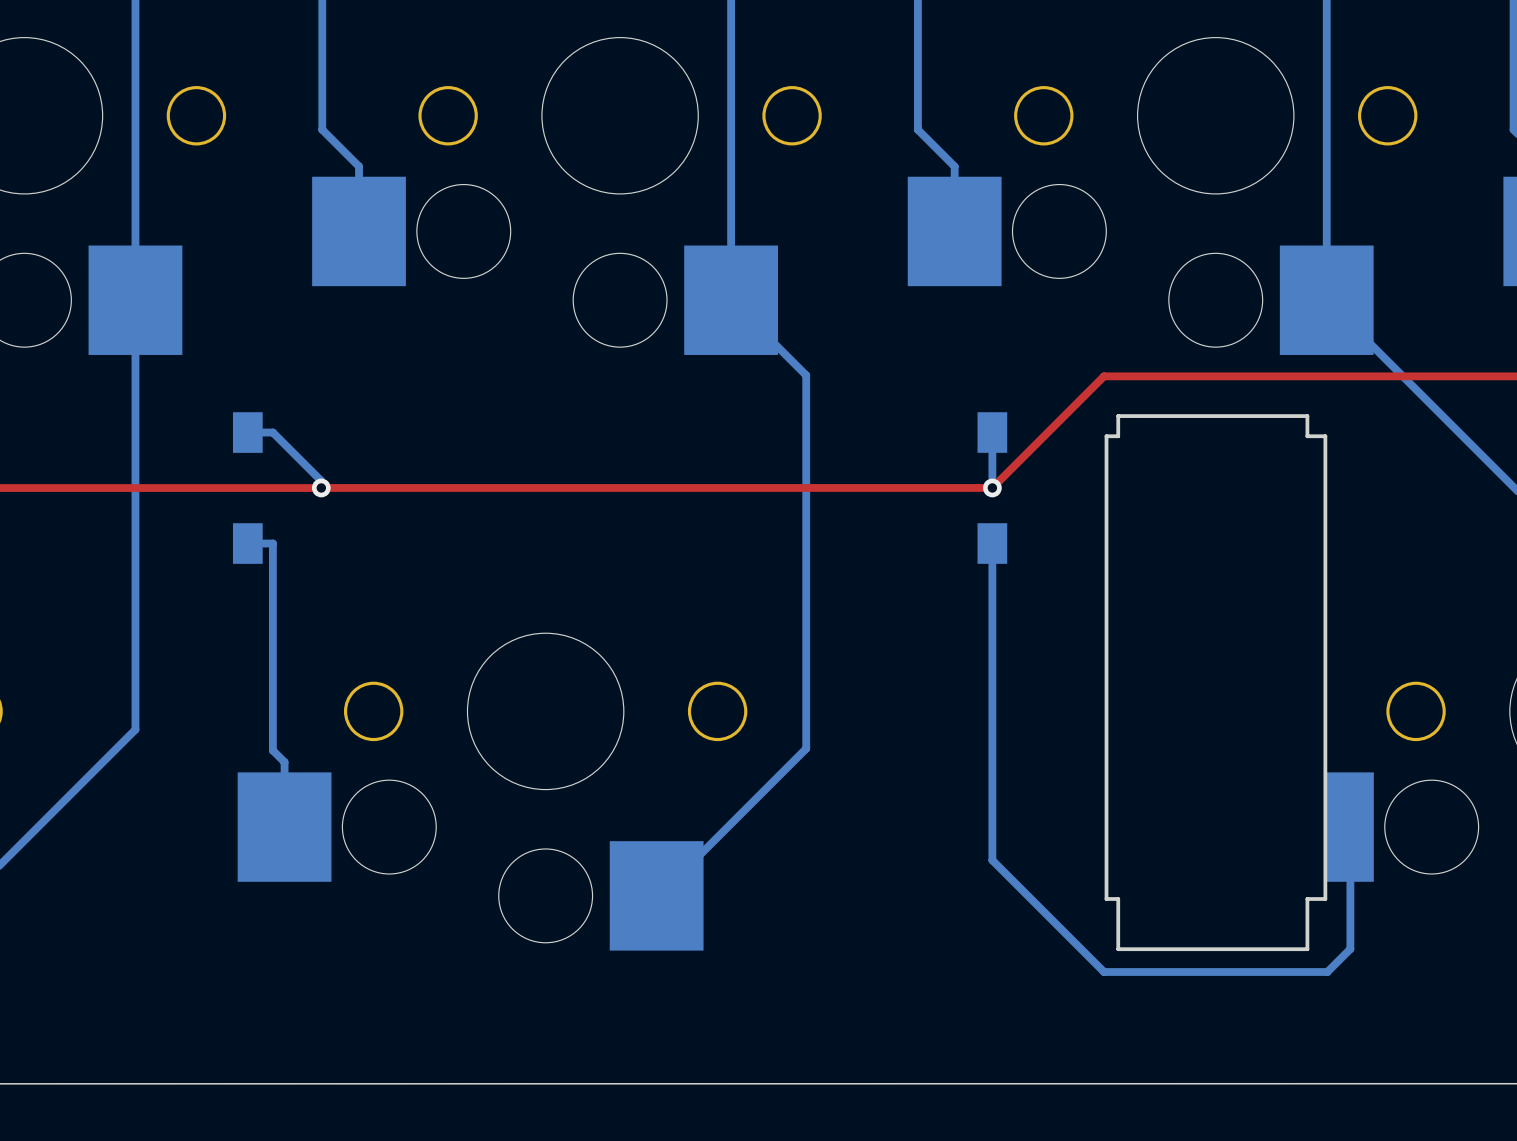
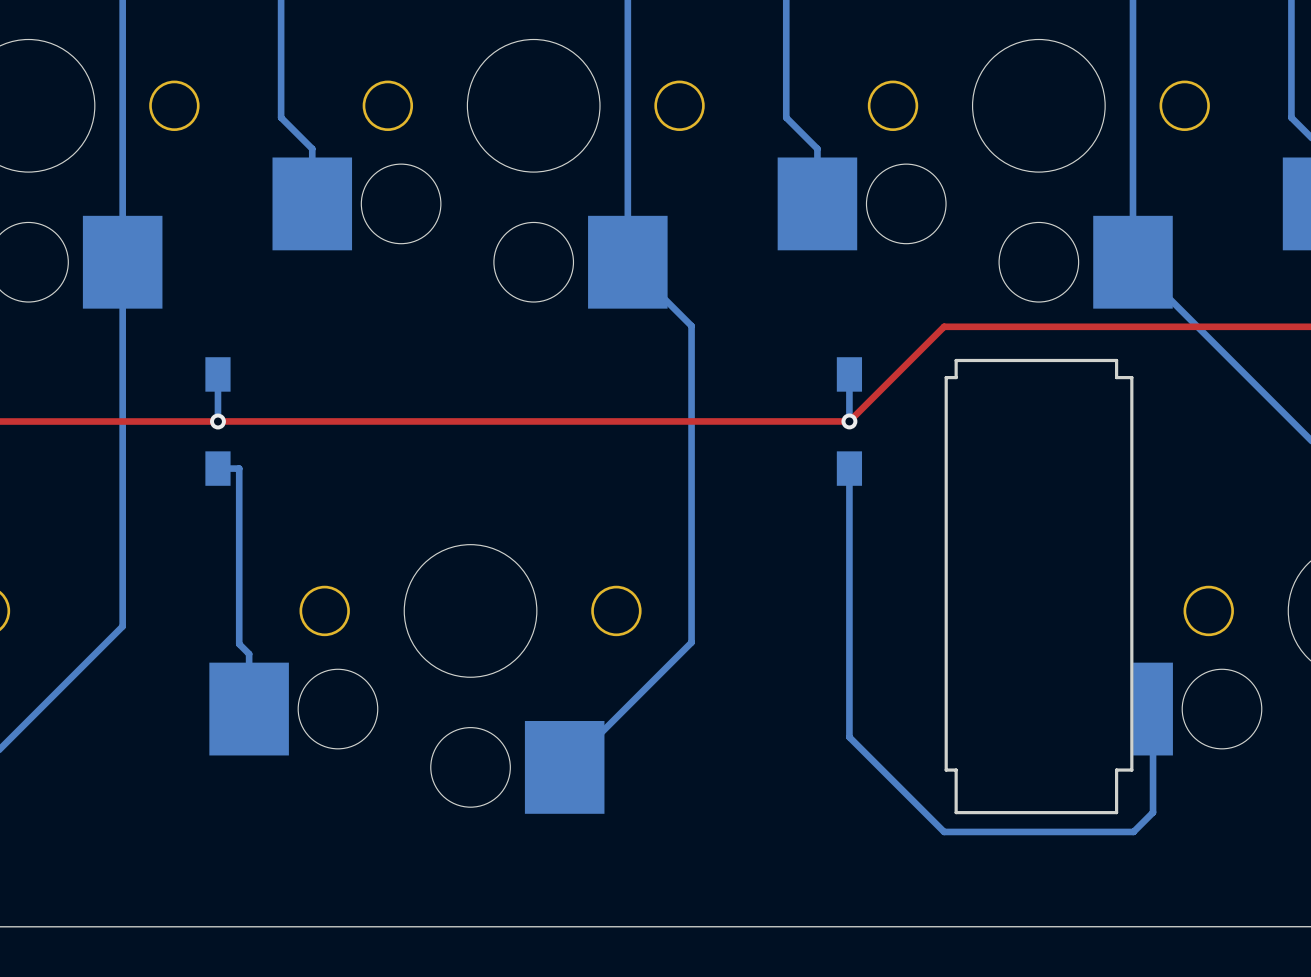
bottom track: (247, 432) (272, 432) (321, 480) (321, 487) -> (217, 374) (217, 421)
via position: (321, 487) -> (217, 421)

